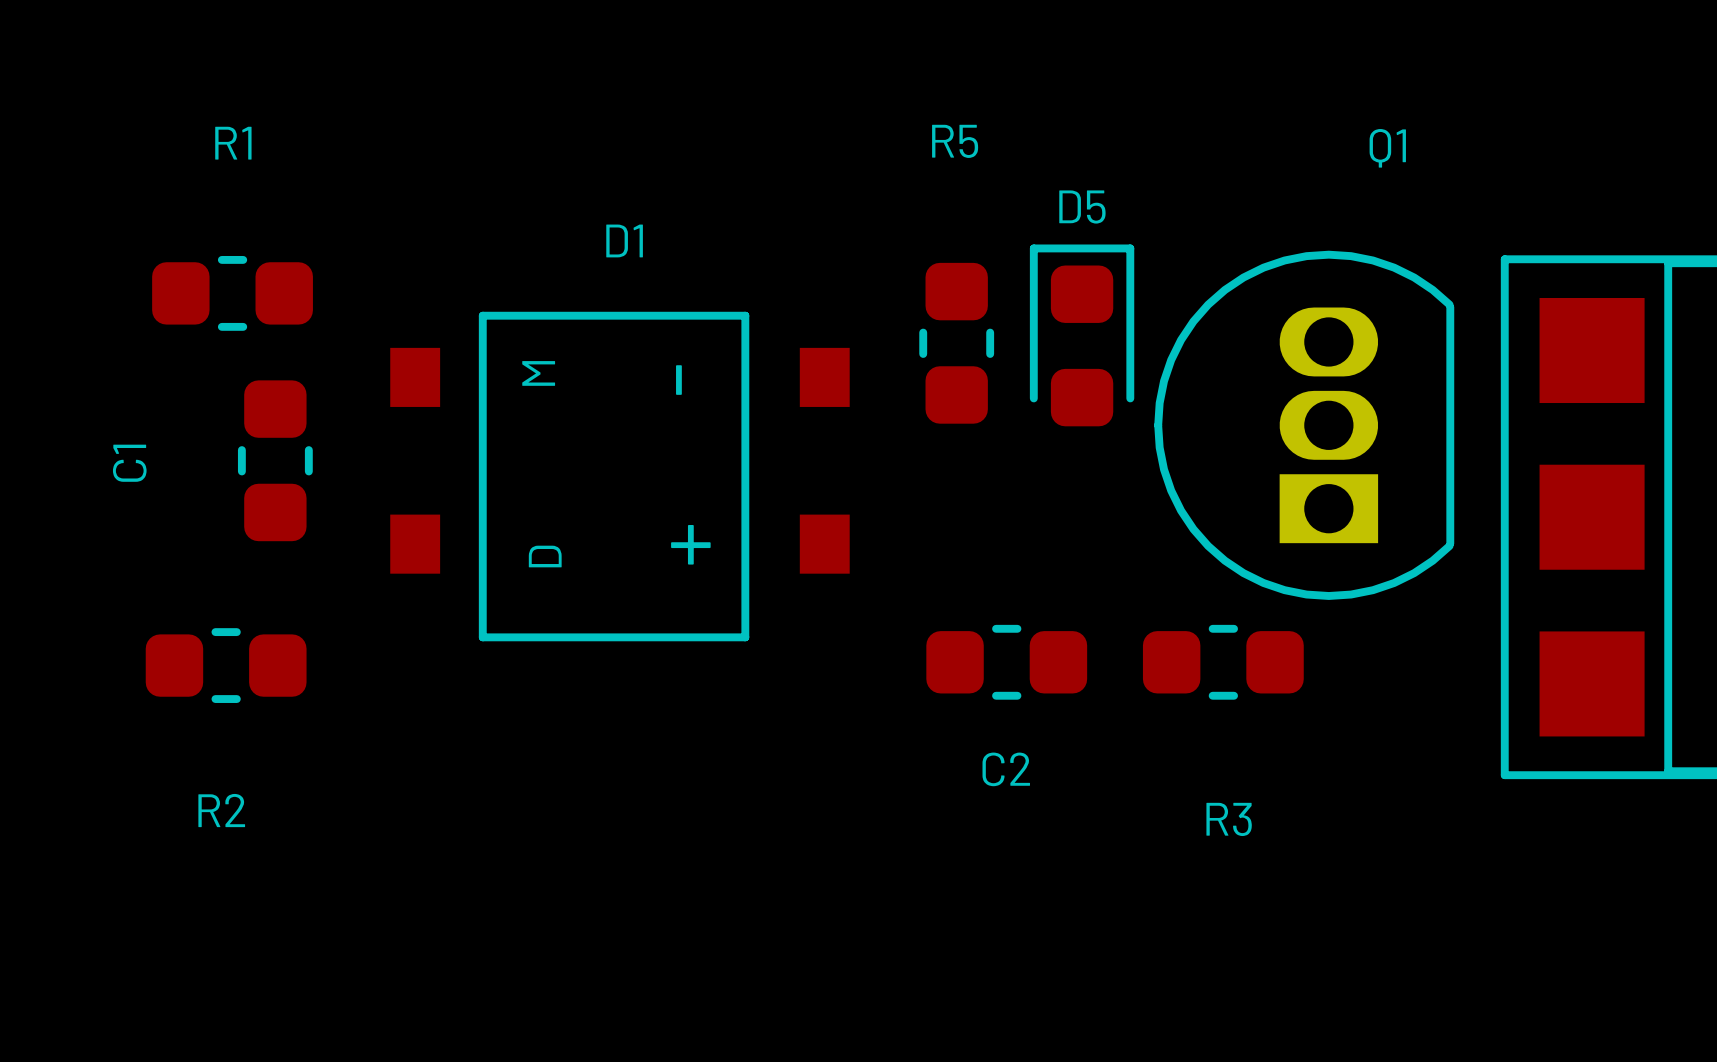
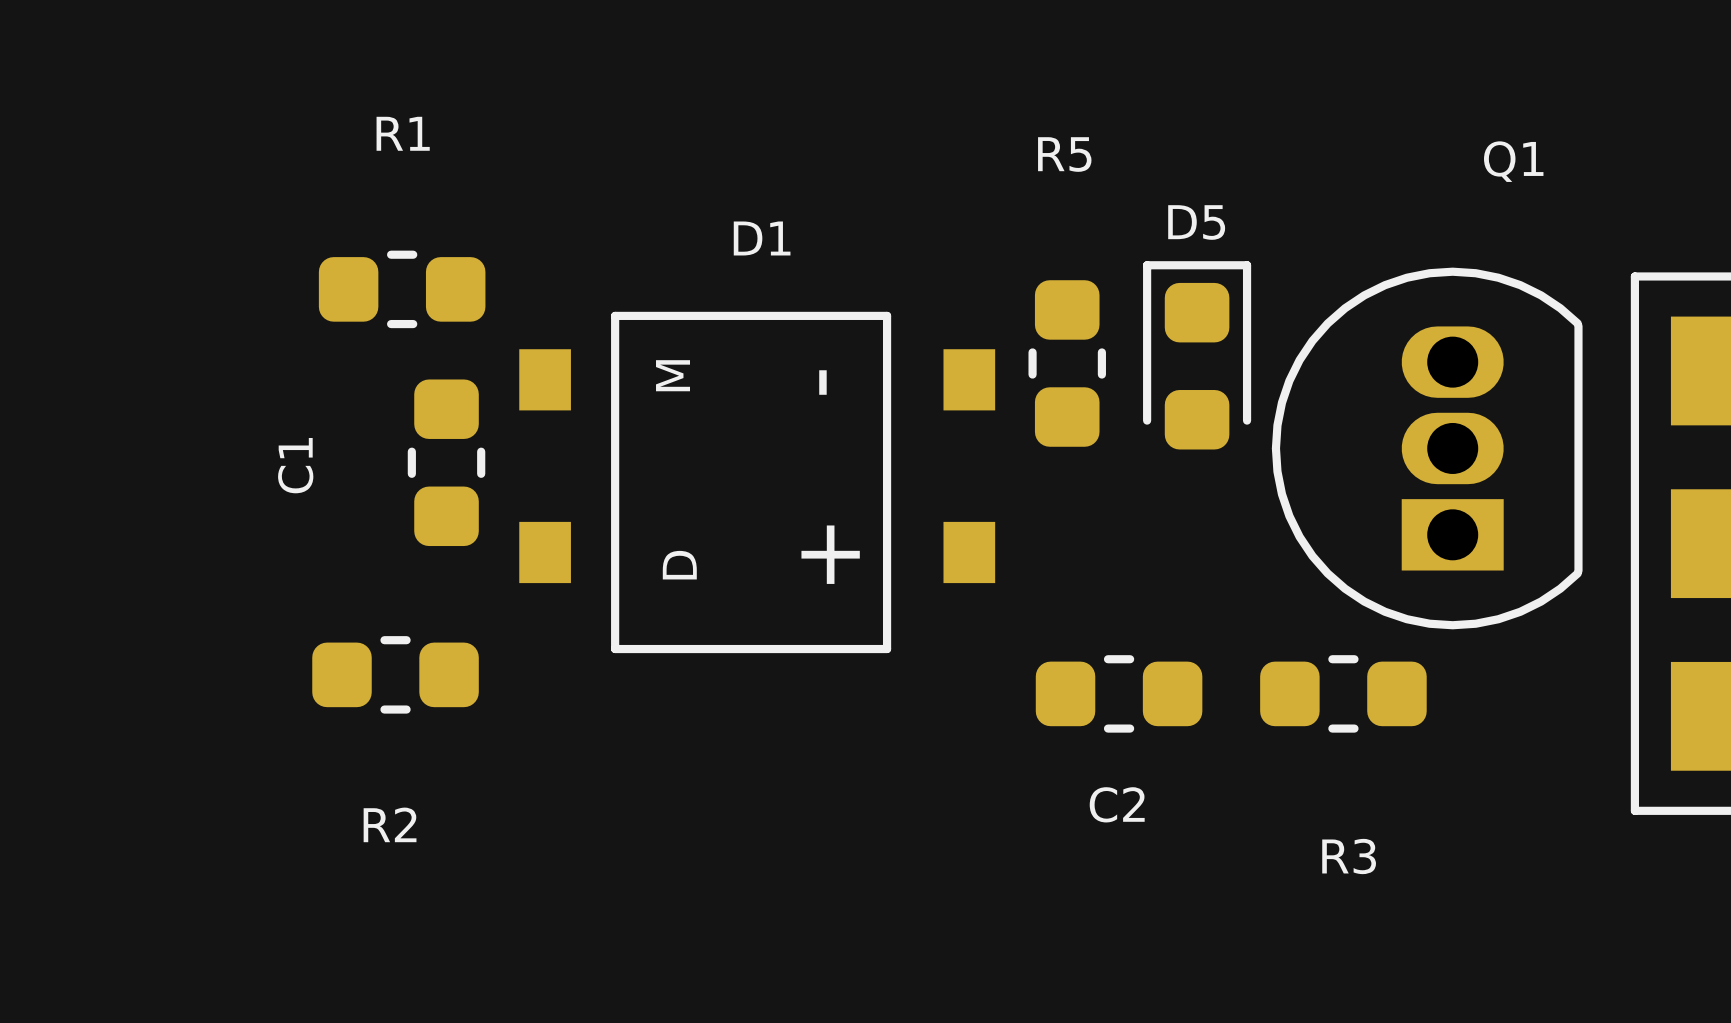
R1 position: (232, 293) -> (402, 289)
C1 position: (275, 460) -> (446, 462)
D1 position: (619, 476) -> (757, 482)
R2 position: (226, 665) -> (395, 674)

